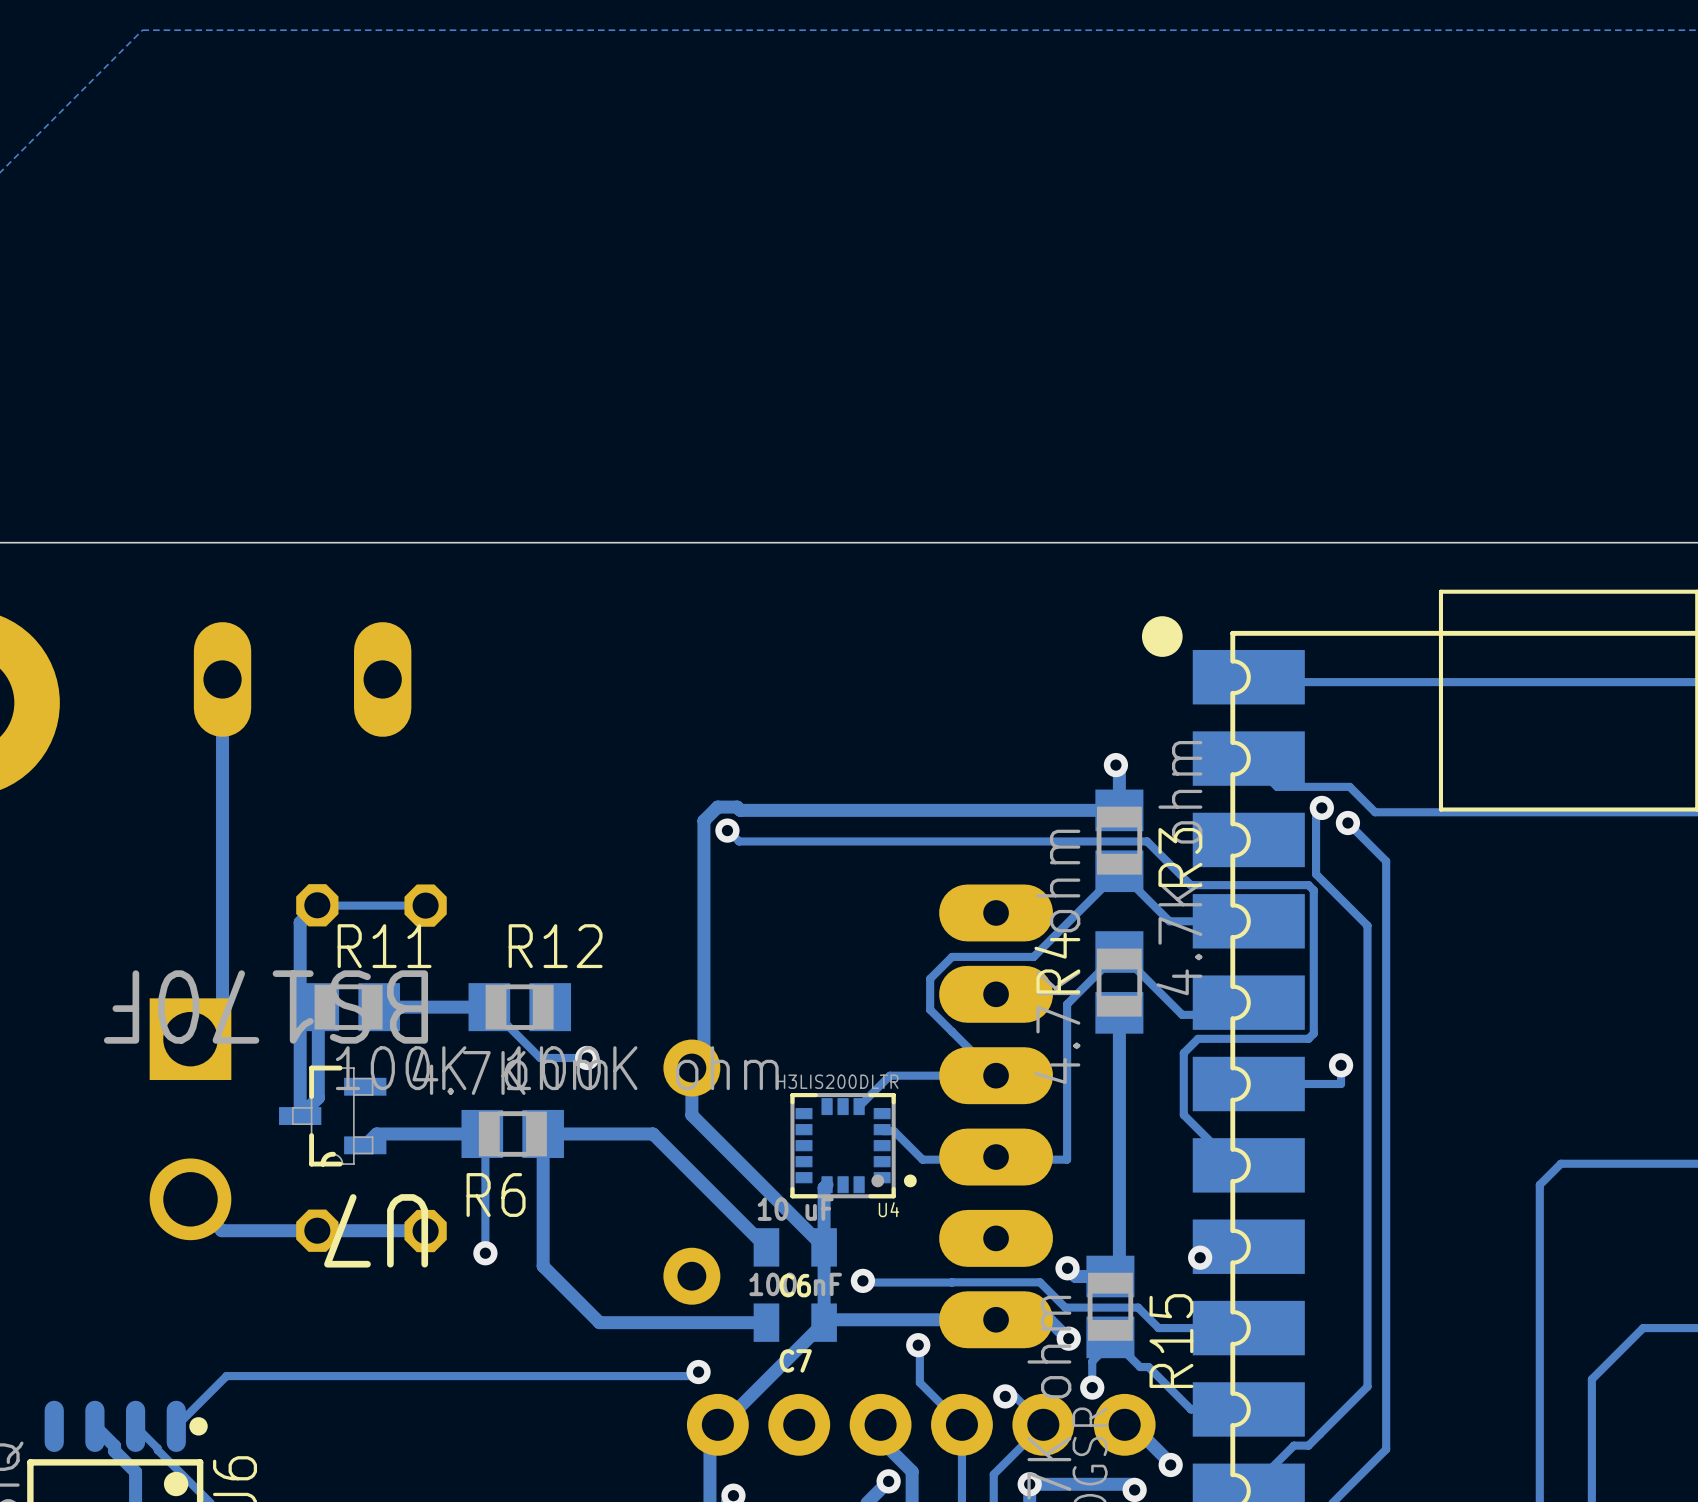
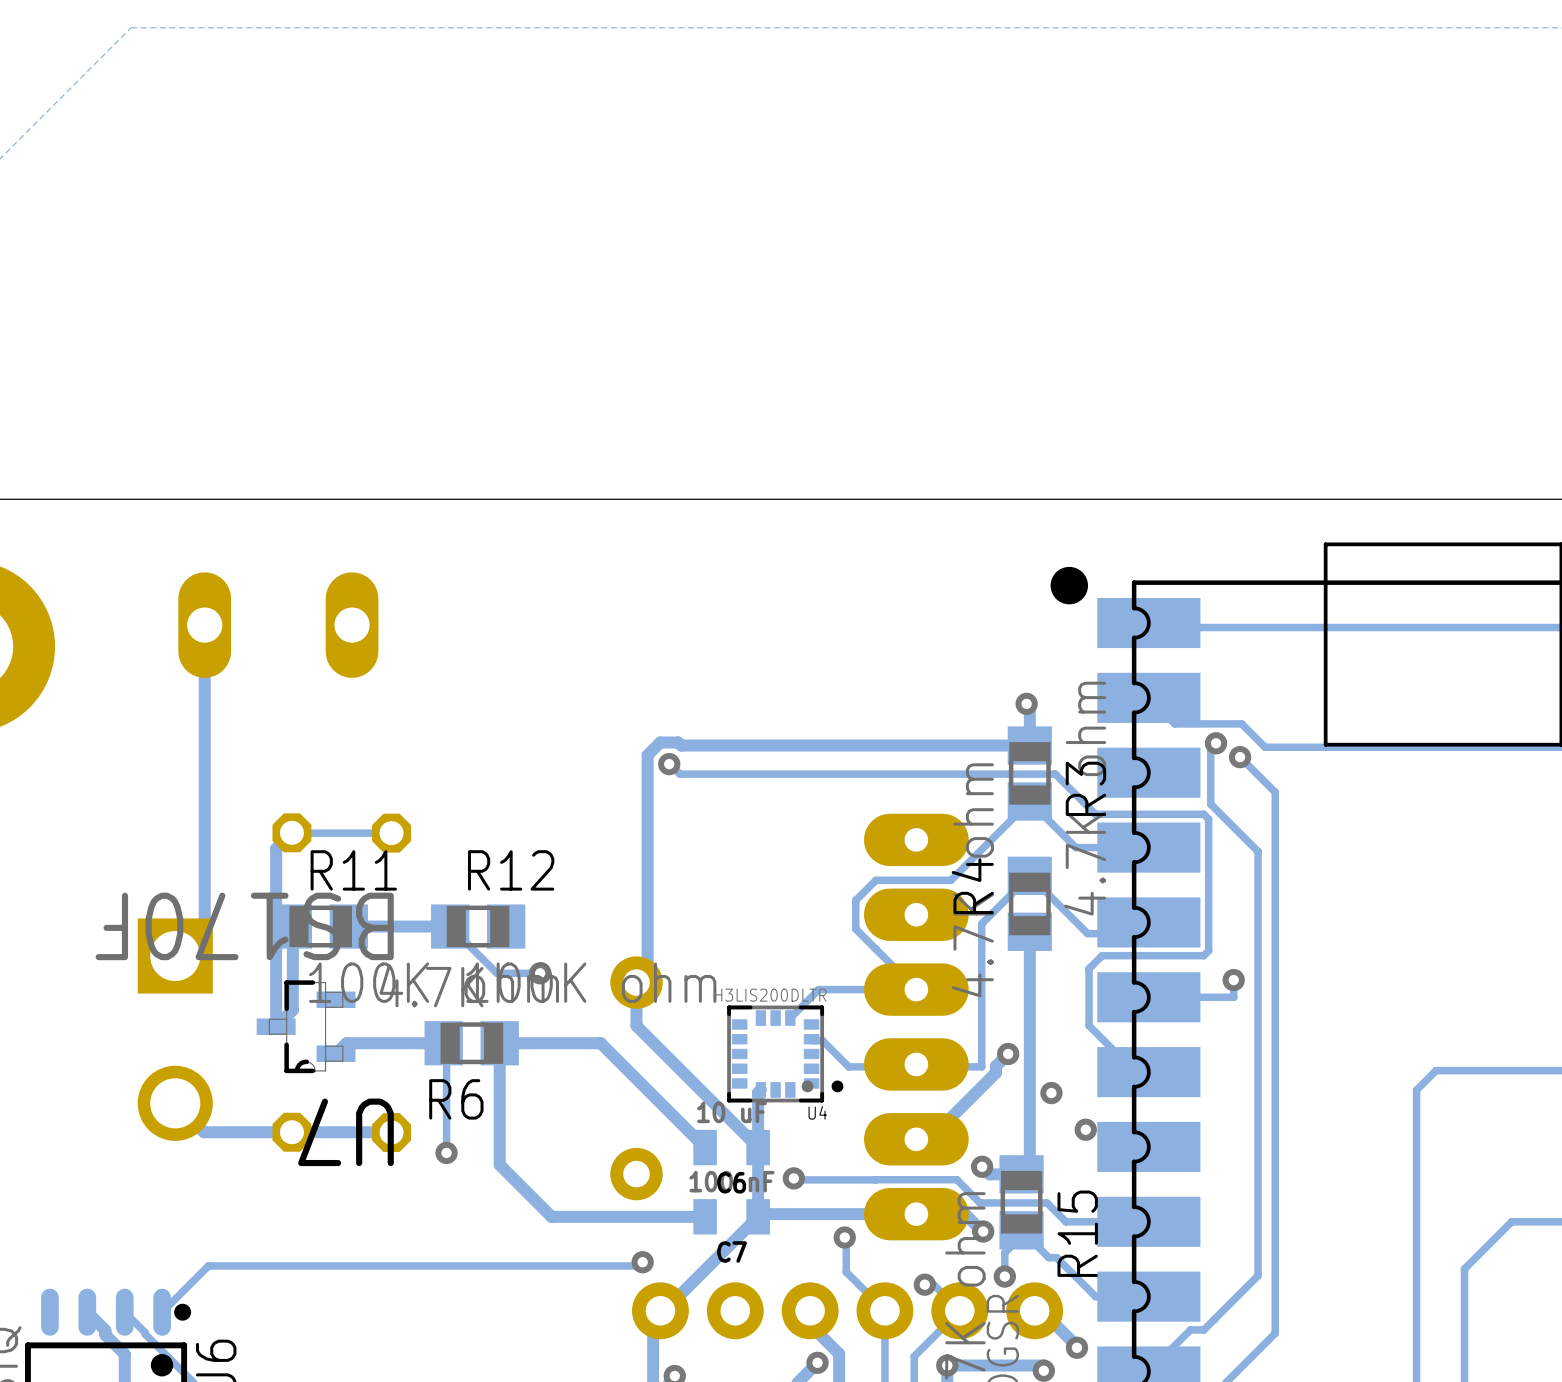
track: none -> (1008, 1053) (995, 1066) (995, 1072) (929, 1139) (916, 1139)
via: none -> (1008, 1053)
via: none -> (1051, 1093)
via position: (1200, 1257) -> (1085, 1129)

